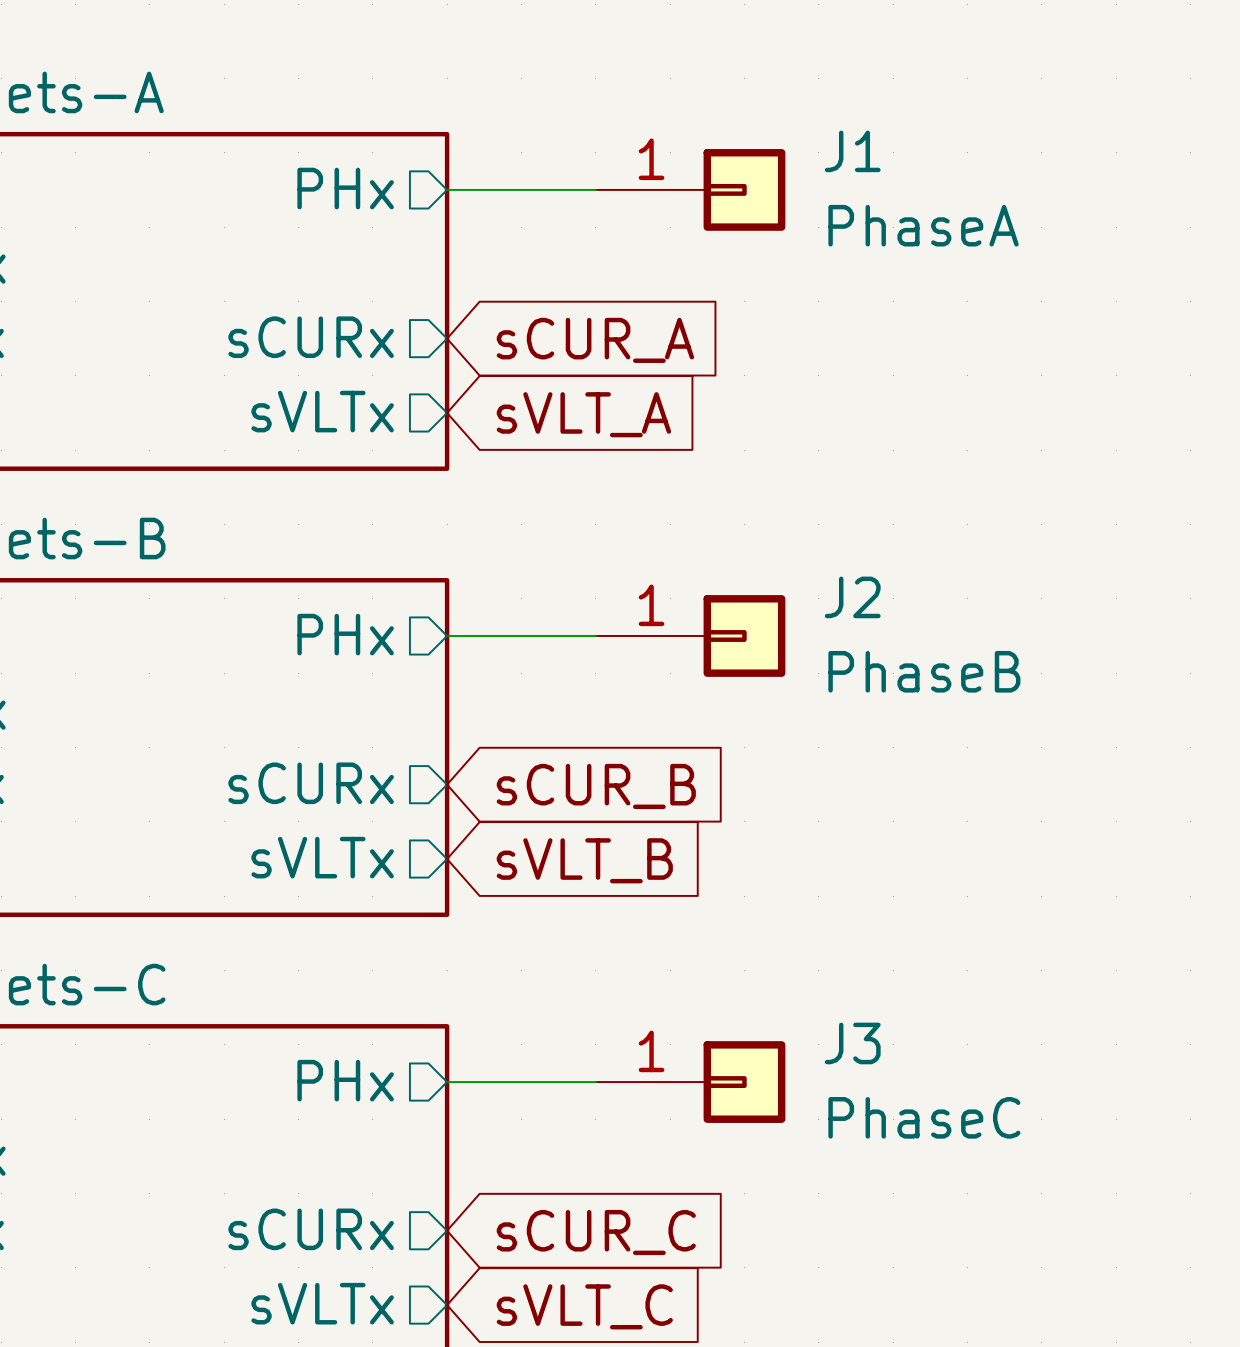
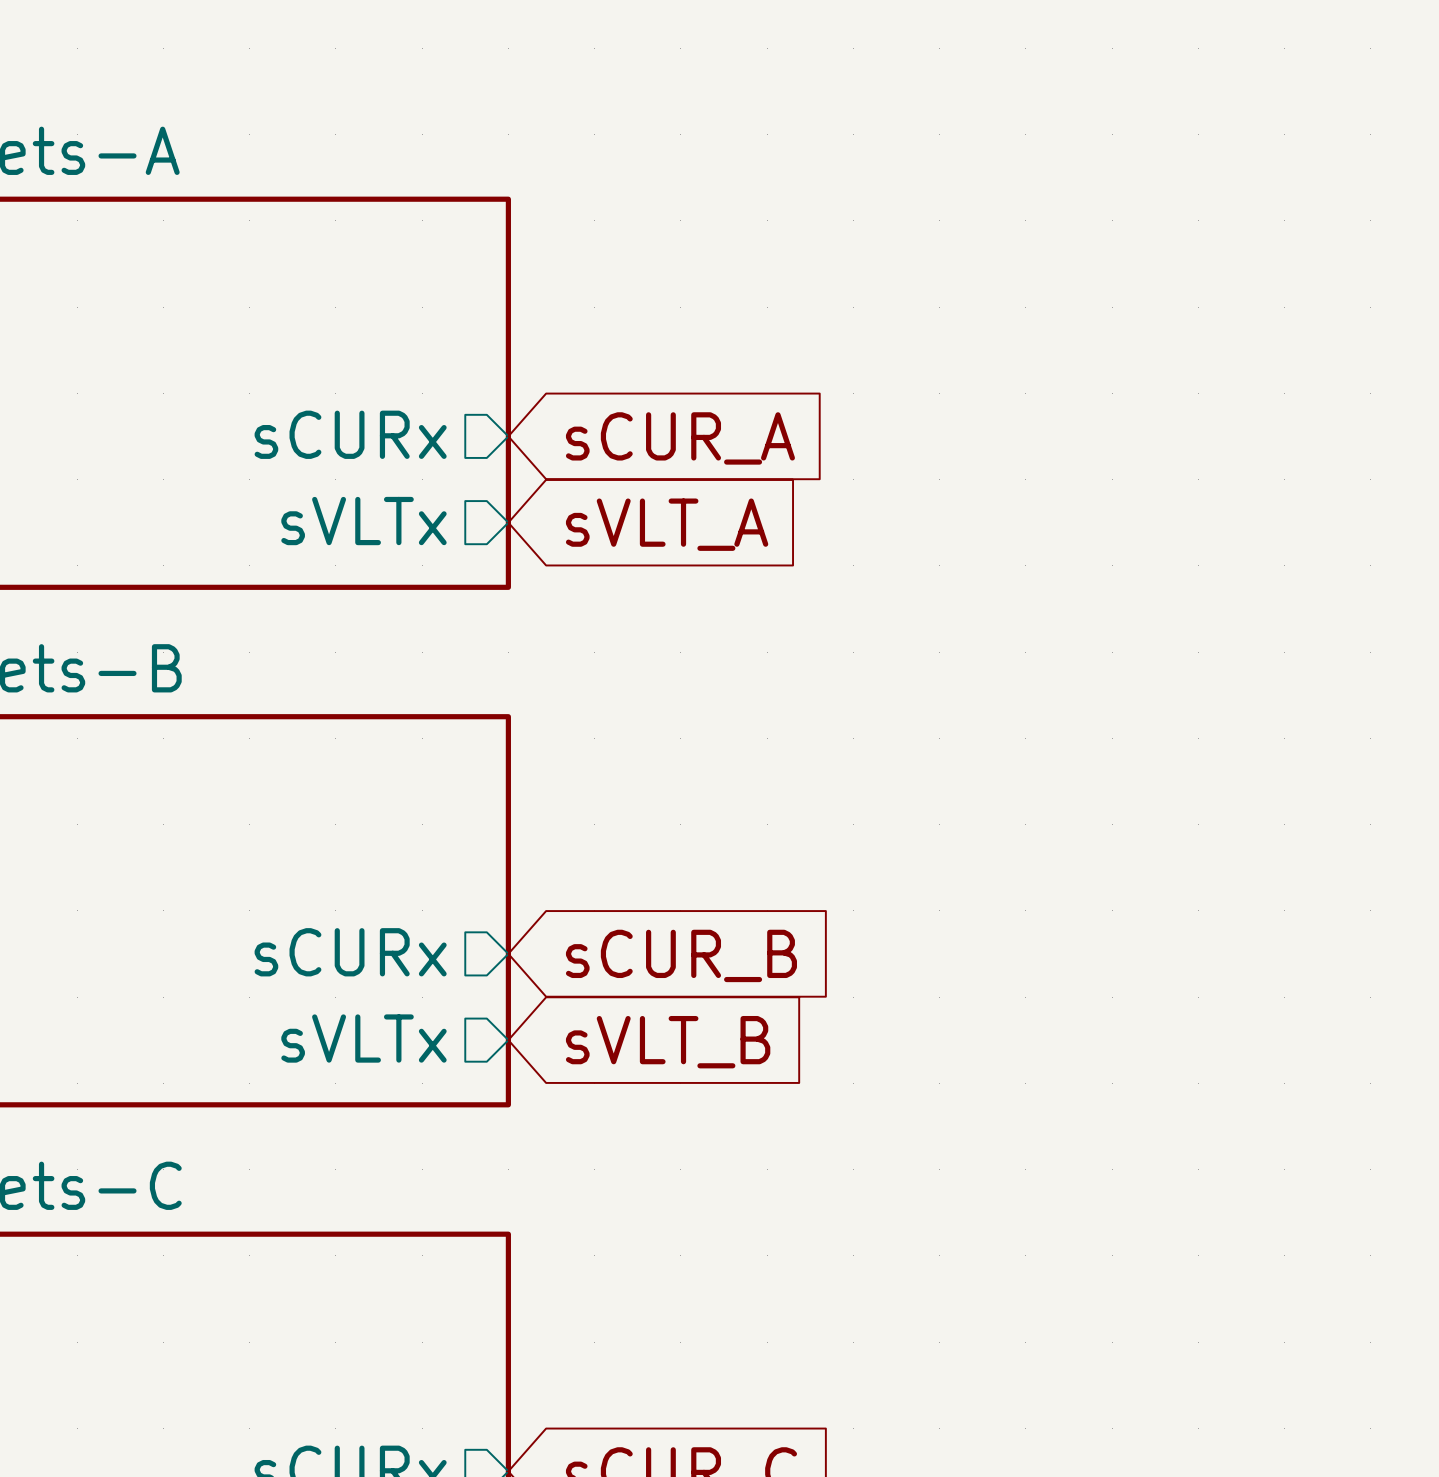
sheet pin: PHx (345, 188) -> none
wire: (447, 189) (595, 189) -> none
J1: PhaseA (690, 189) -> none
sheet pin: PHx (345, 634) -> none
wire: (447, 635) (595, 635) -> none
J2: PhaseB (690, 635) -> none
sheet pin: PHx (345, 1080) -> none
wire: (447, 1082) (595, 1082) -> none
J3: PhaseC (690, 1082) -> none

